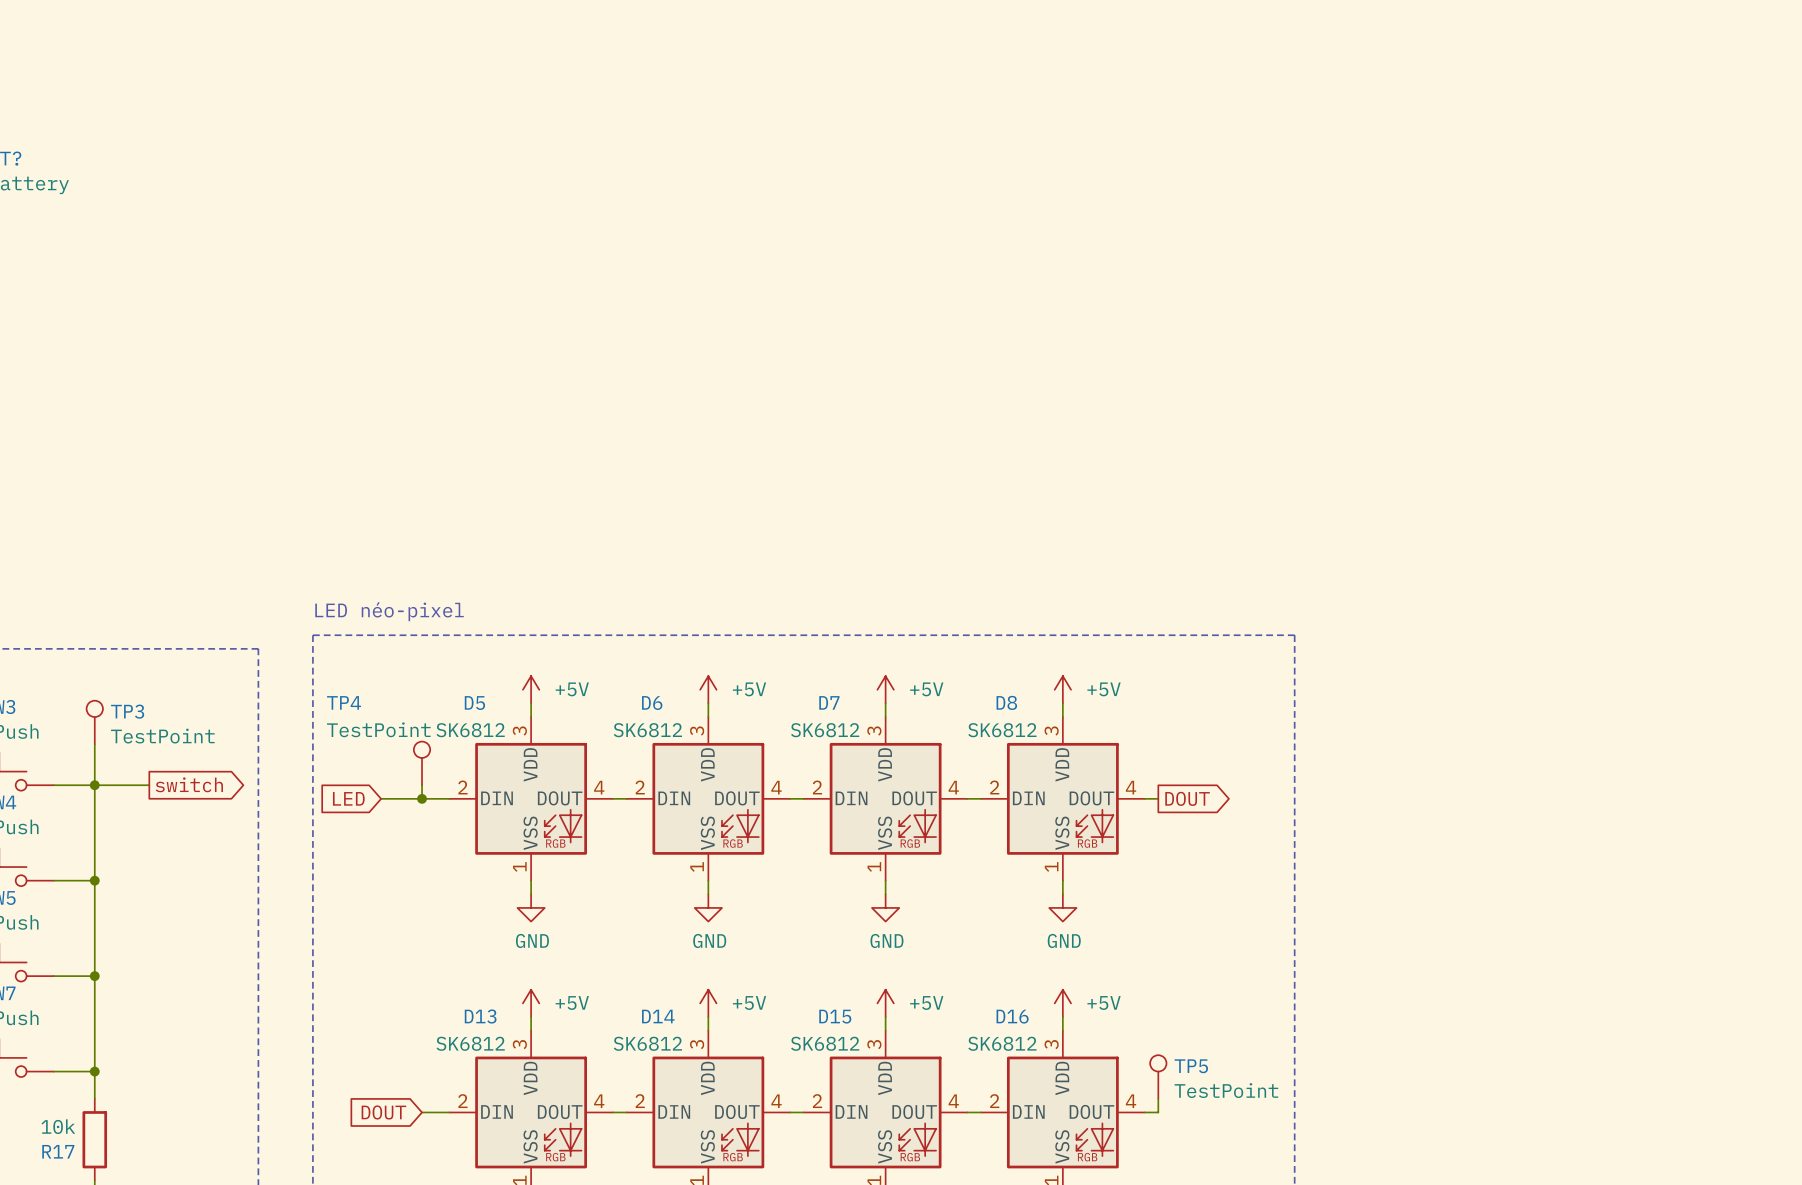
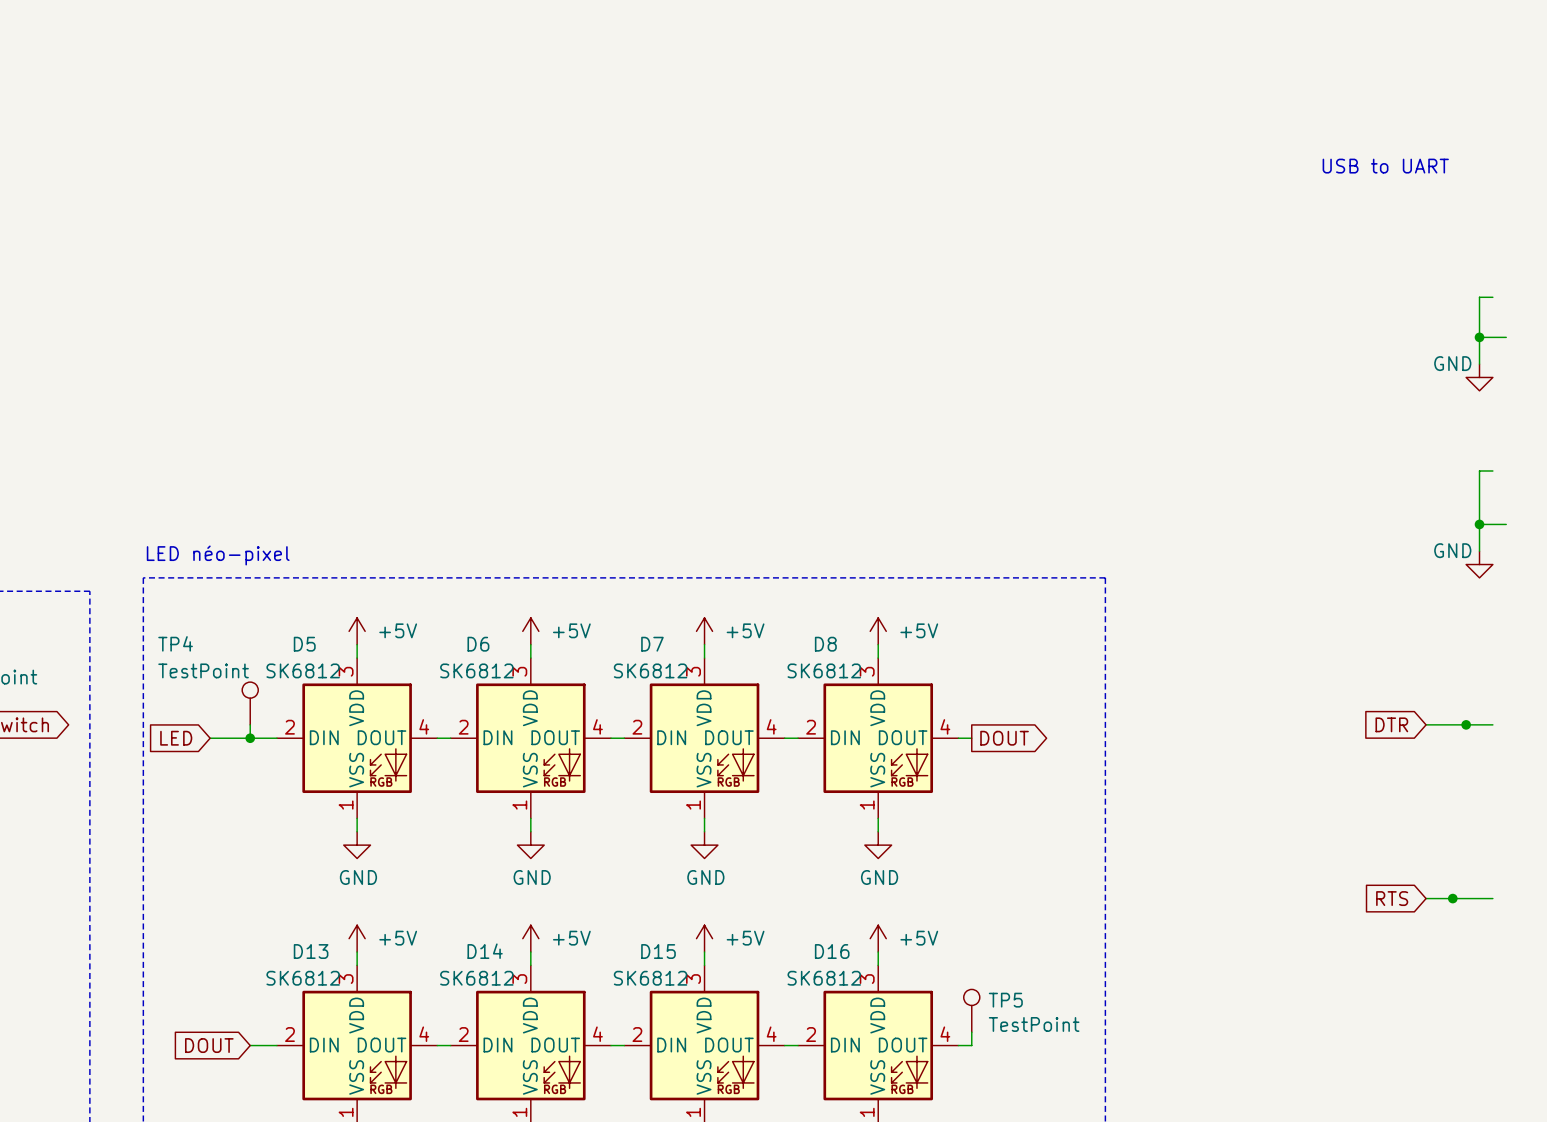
text: none -> USB to UART (1385, 166)
wire: none -> (1492, 297) (1479, 297) (1479, 364)
wire: none -> (1479, 337) (1506, 337)
junction: none -> (1479, 337)
power symbol: none -> GND (1479, 377)
wire: none -> (1492, 470) (1479, 470) (1479, 551)
wire: none -> (1479, 524) (1506, 524)
junction: none -> (1479, 524)
power symbol: none -> GND (1479, 564)
global label: none -> DTR (1391, 724)
wire: none -> (1426, 724) (1492, 724)
junction: none -> (1466, 724)
global label: none -> RTS (1392, 898)
wire: none -> (1426, 898) (1492, 898)
junction: none -> (1452, 898)

